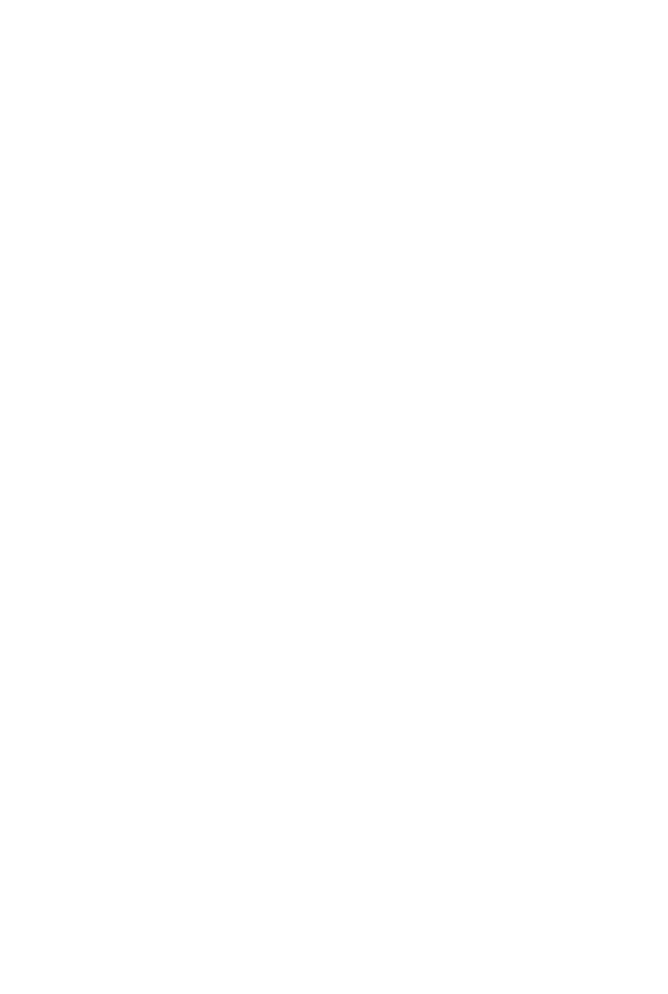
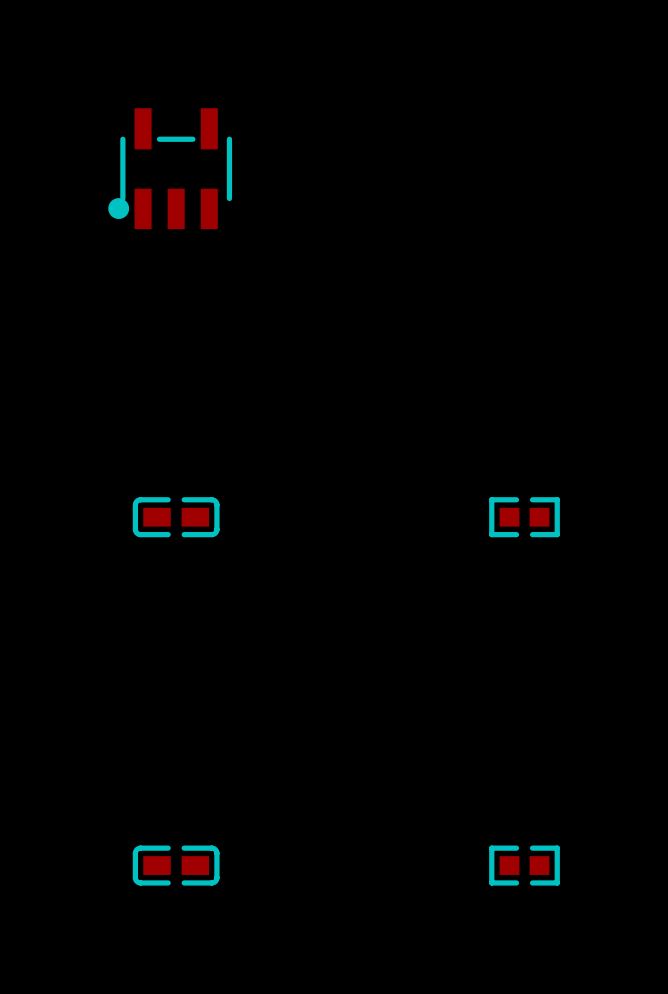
part: none -> (170, 168)
part: none -> (176, 517)
part: none -> (524, 517)
part: none -> (176, 865)
part: none -> (524, 865)

